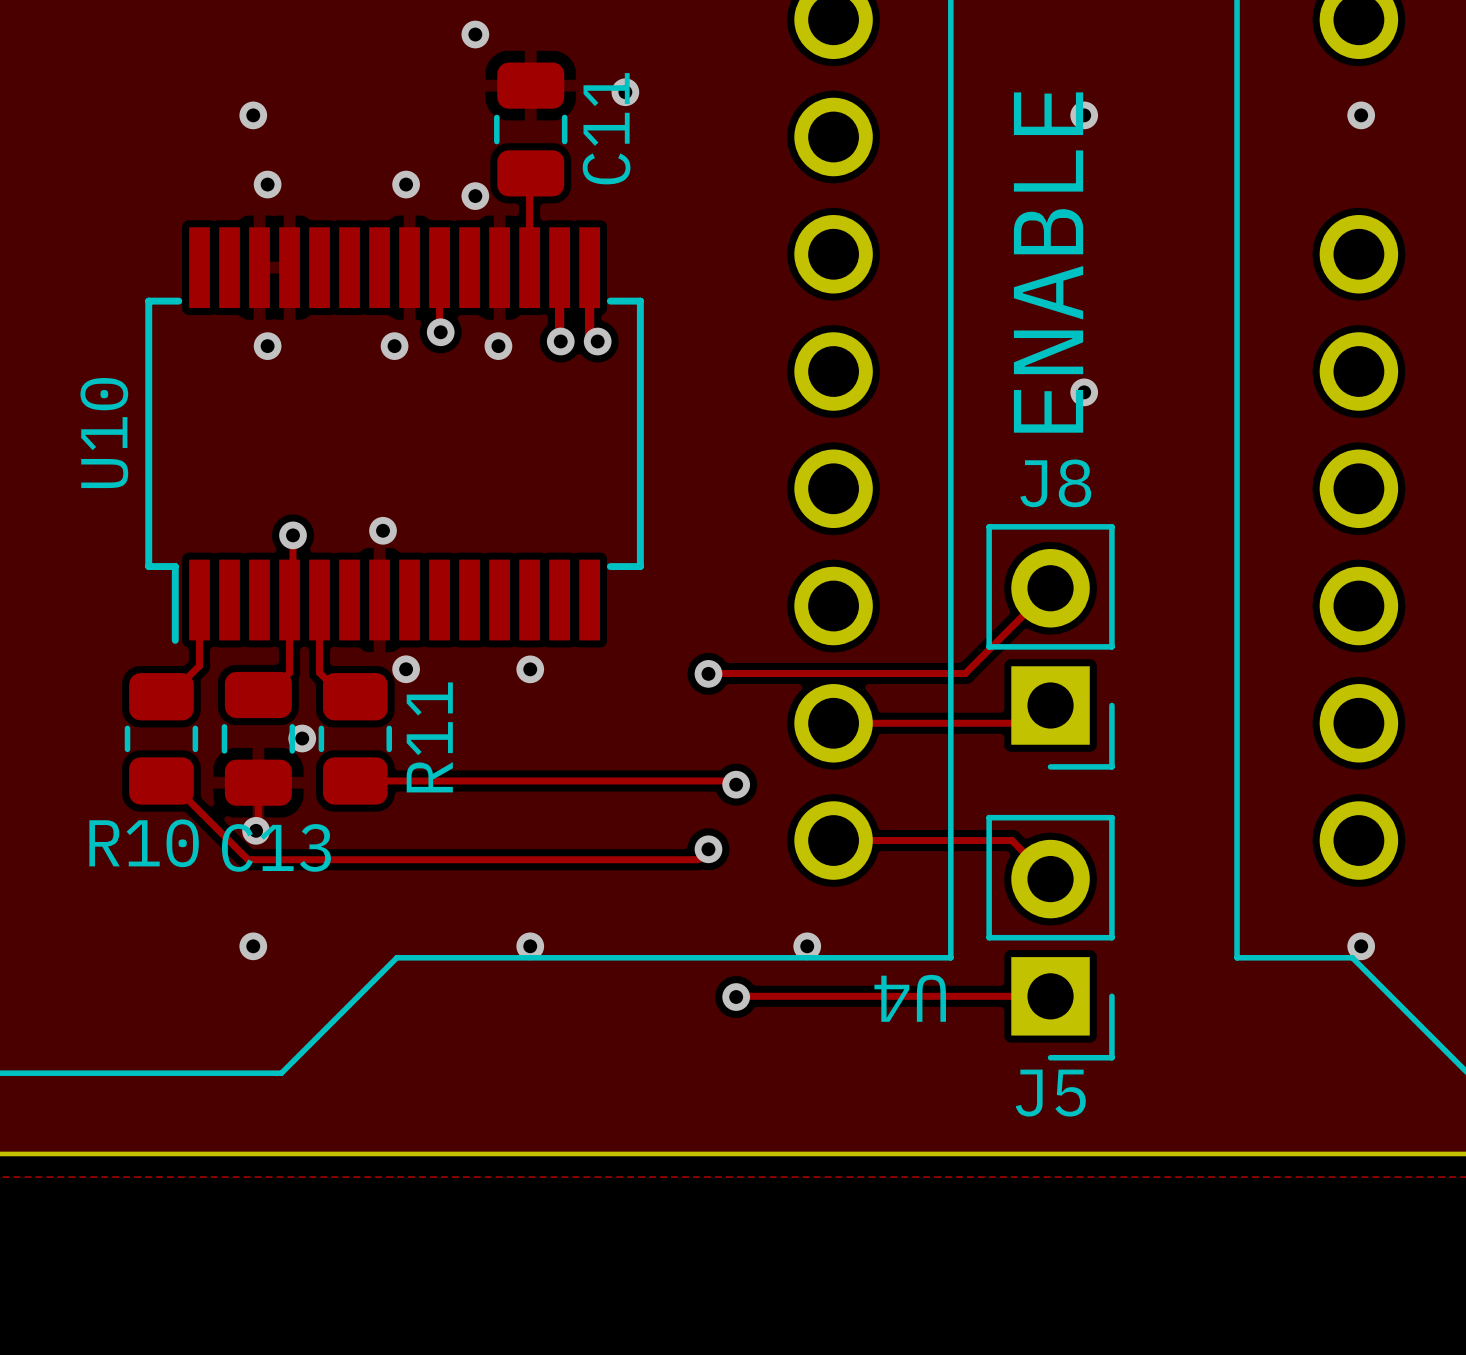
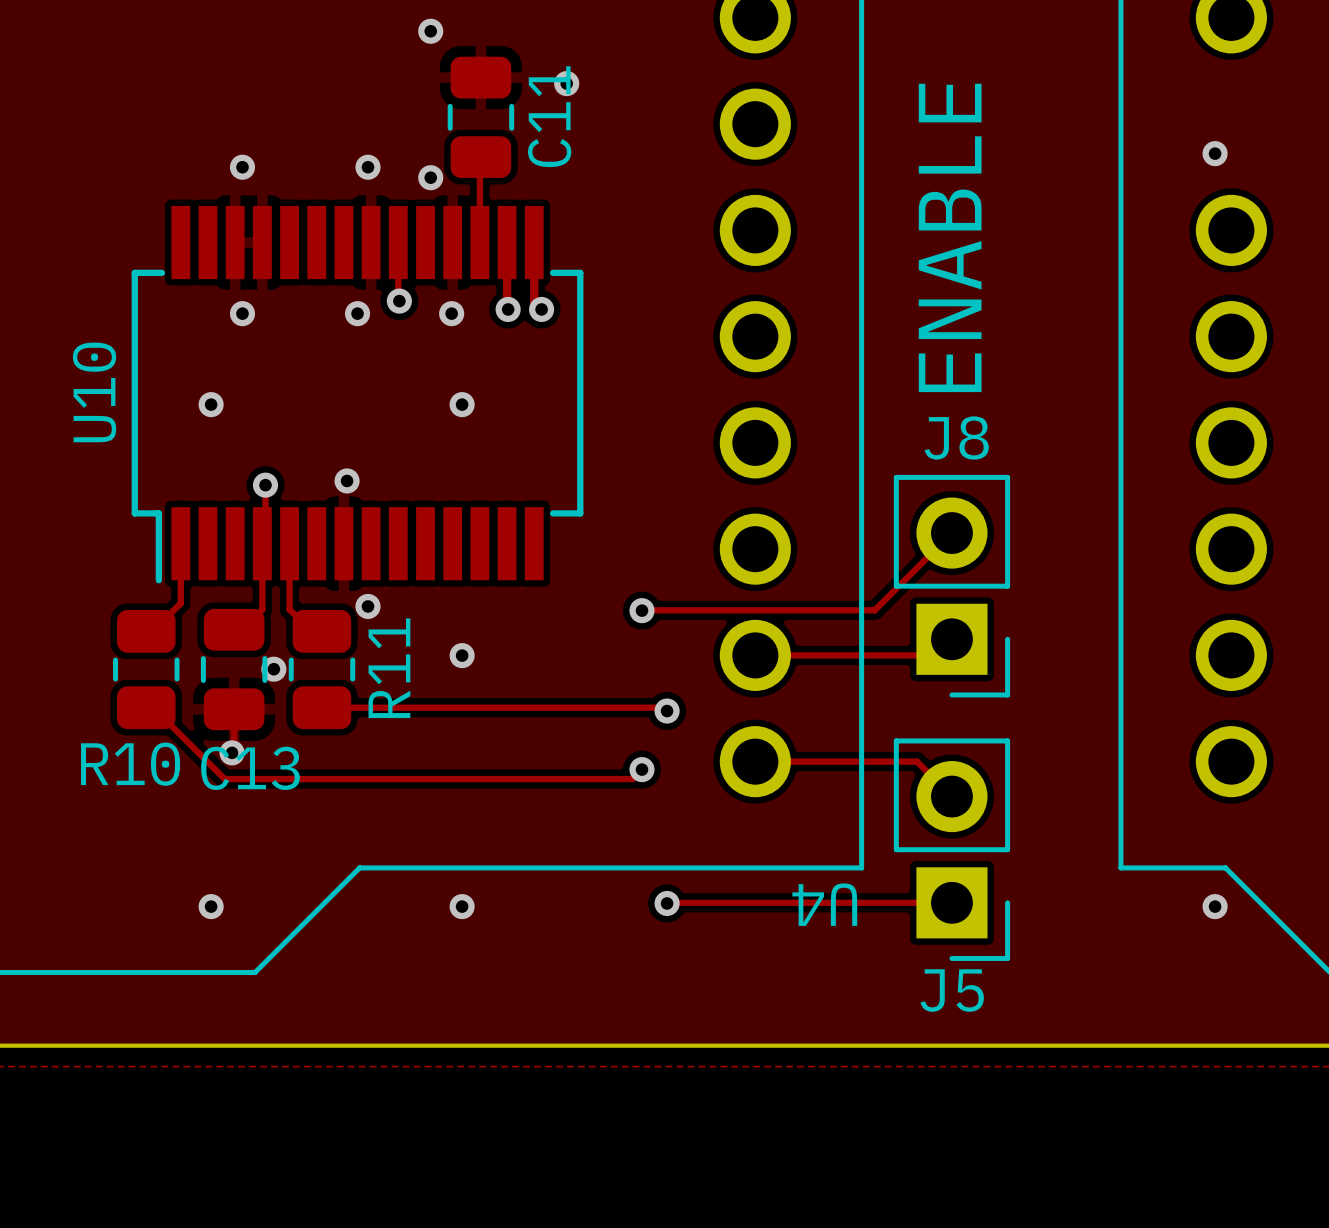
via: (253, 115) -> none
via: (1084, 115) -> none
via position: (1361, 115) -> (1215, 153)
via: (1084, 392) -> none
via: none -> (211, 404)
via: none -> (462, 404)
via position: (530, 669) -> (462, 655)
via position: (253, 946) -> (211, 906)
via position: (530, 946) -> (462, 906)
via: (807, 946) -> none
via position: (1361, 946) -> (1215, 906)

